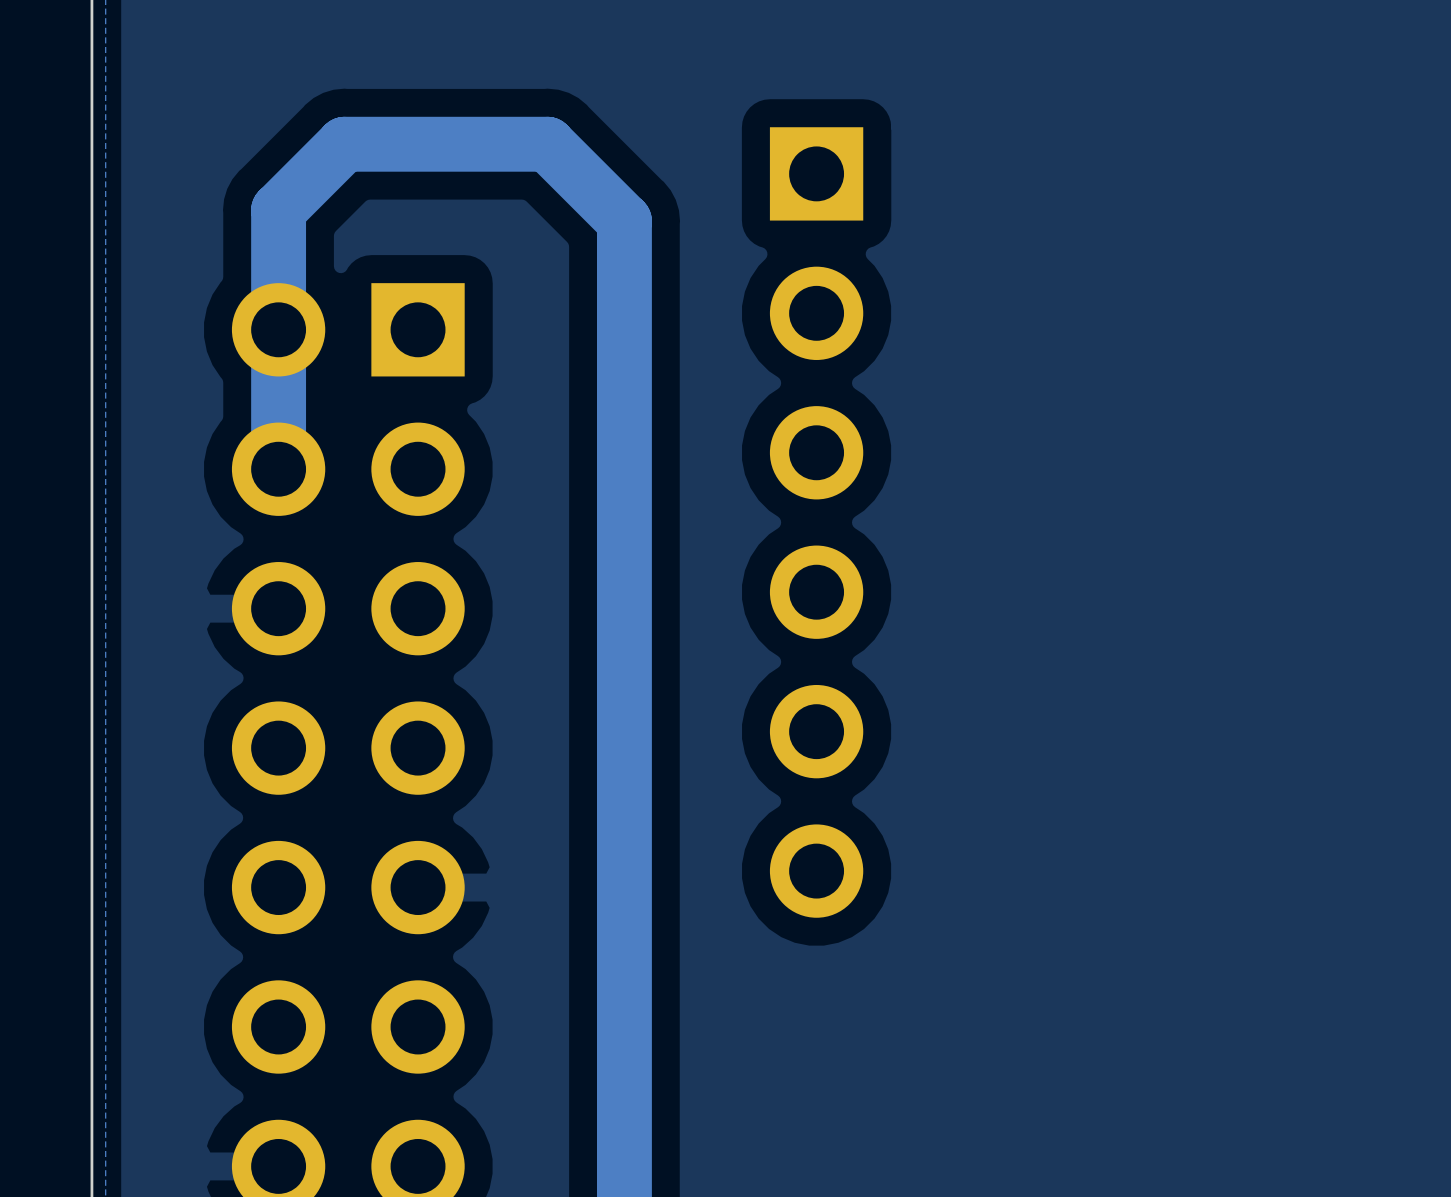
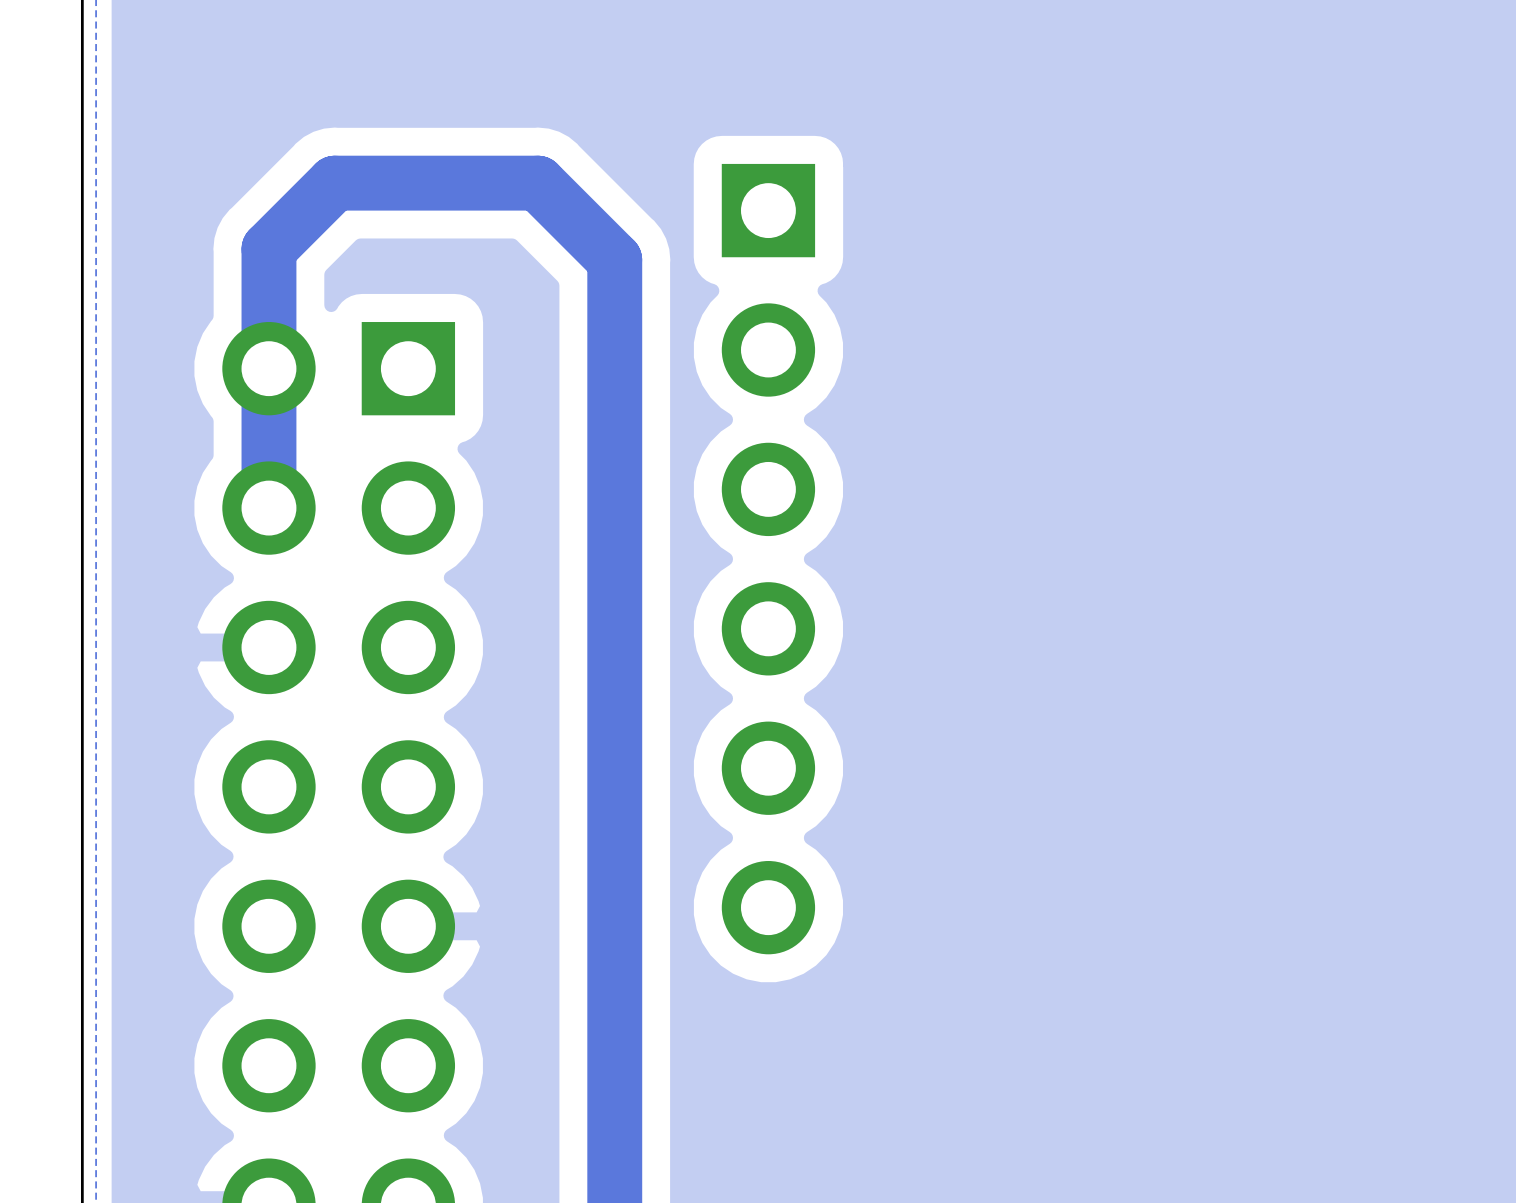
part position: (816, 522) -> (768, 559)

